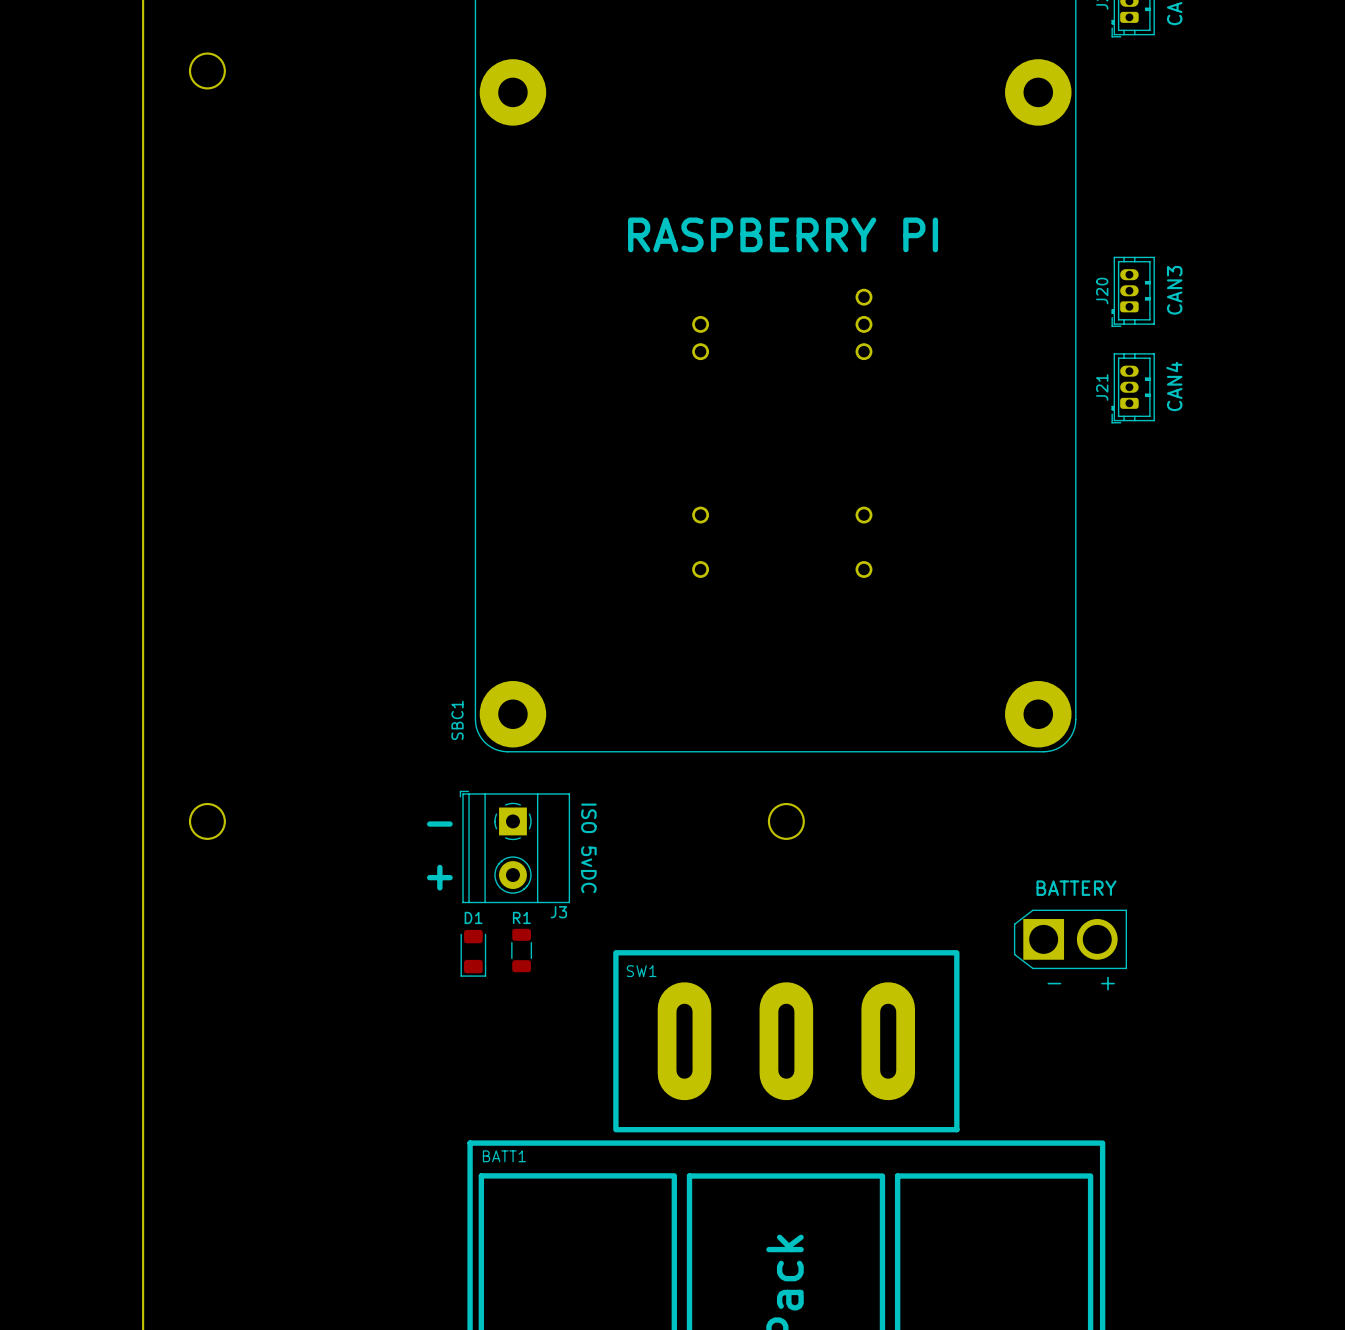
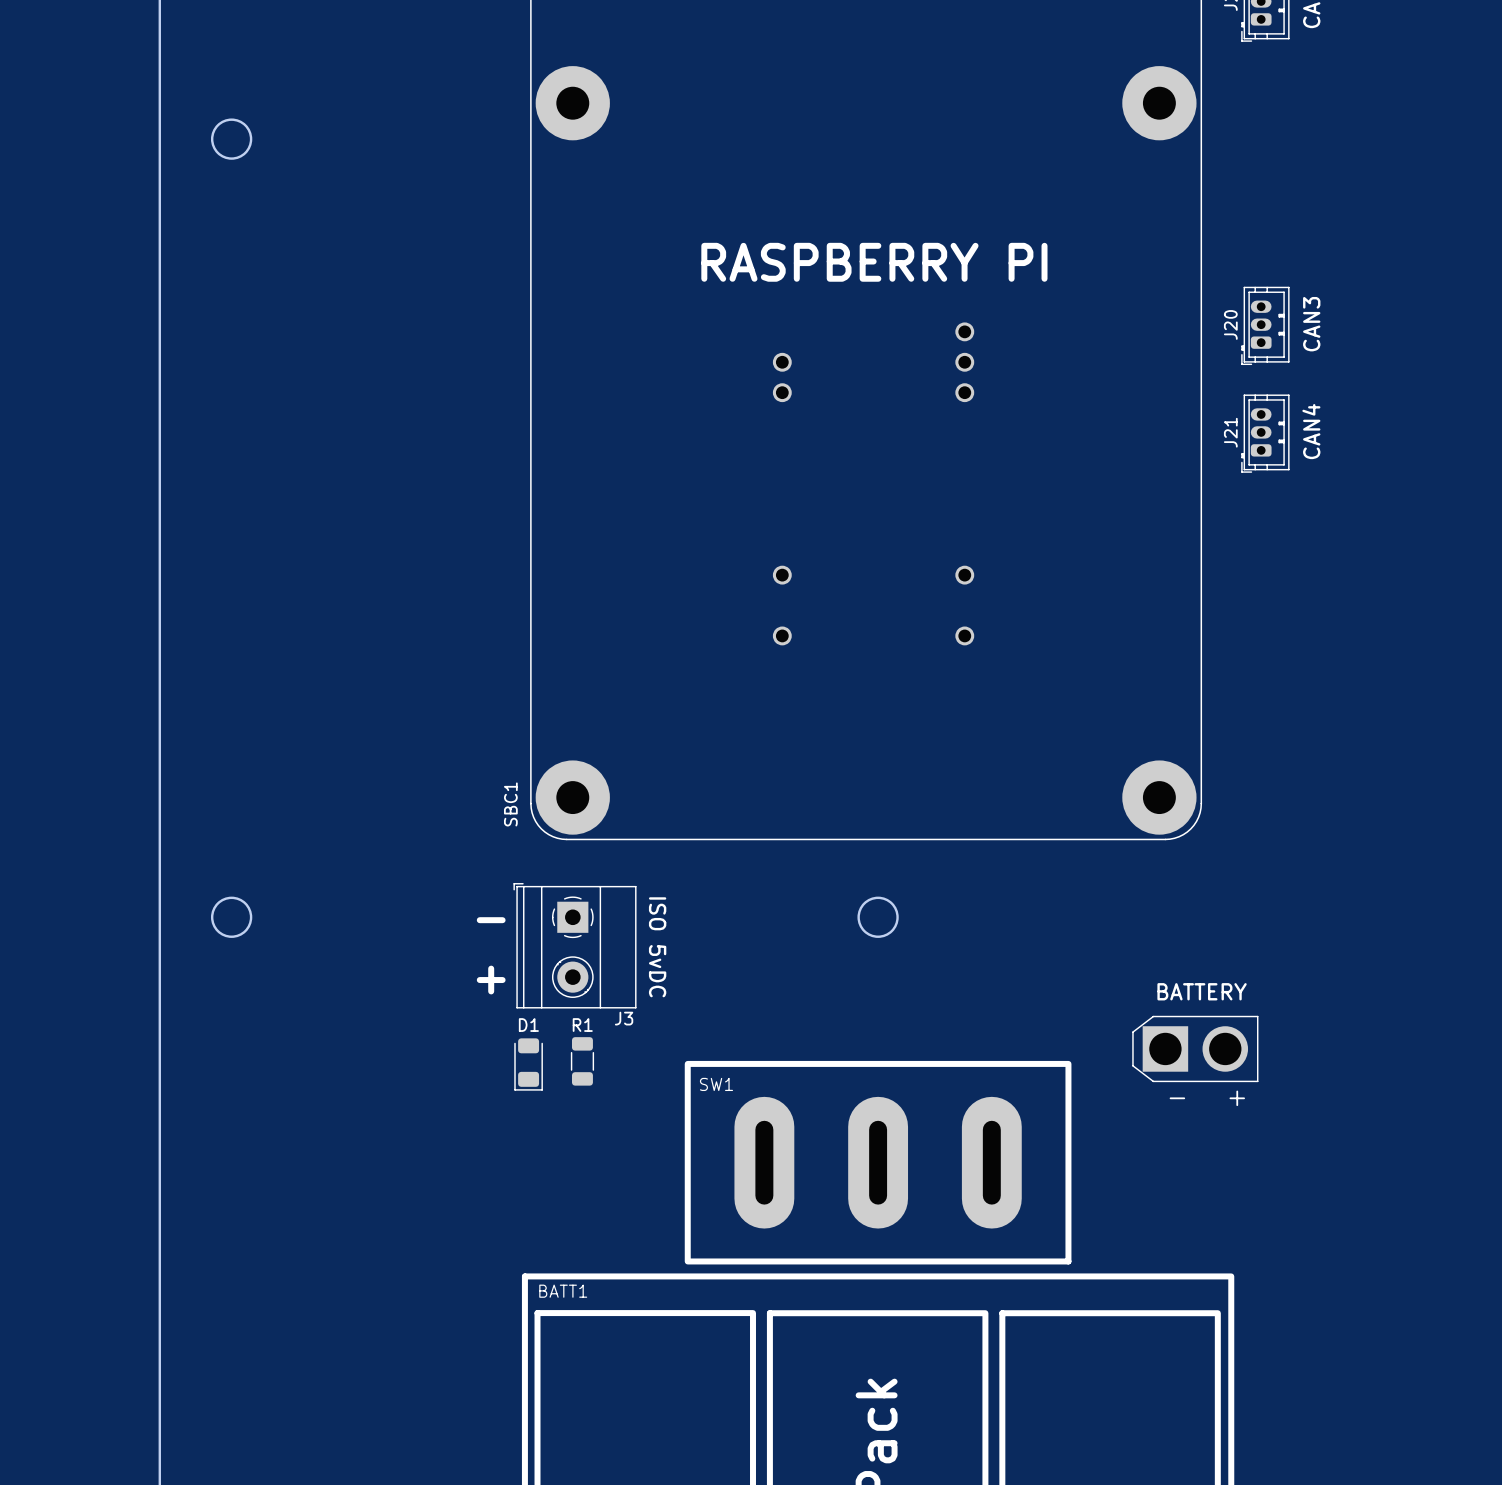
round board edge position: (207, 70) -> (231, 139)

